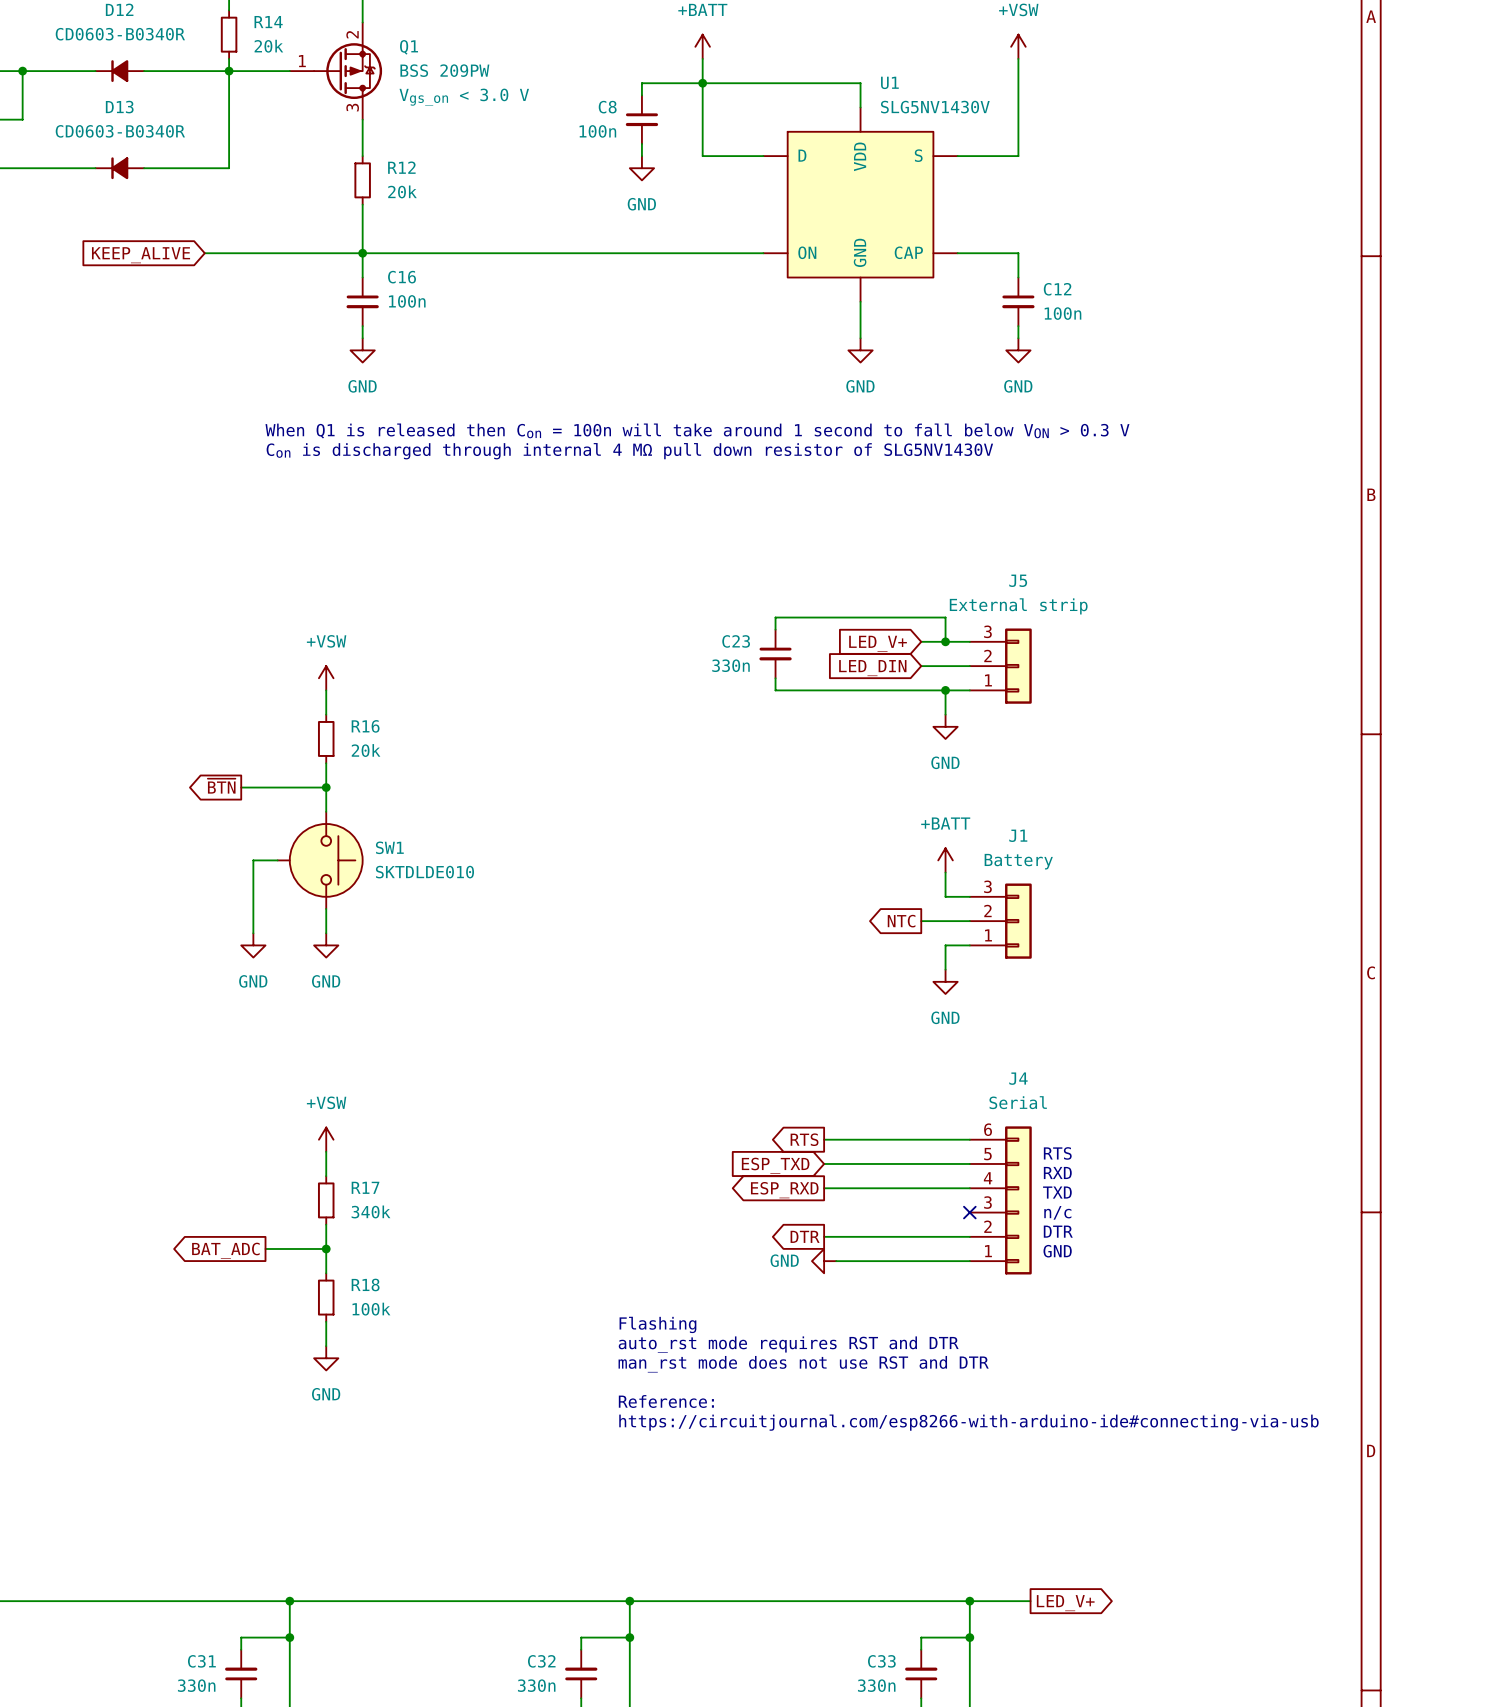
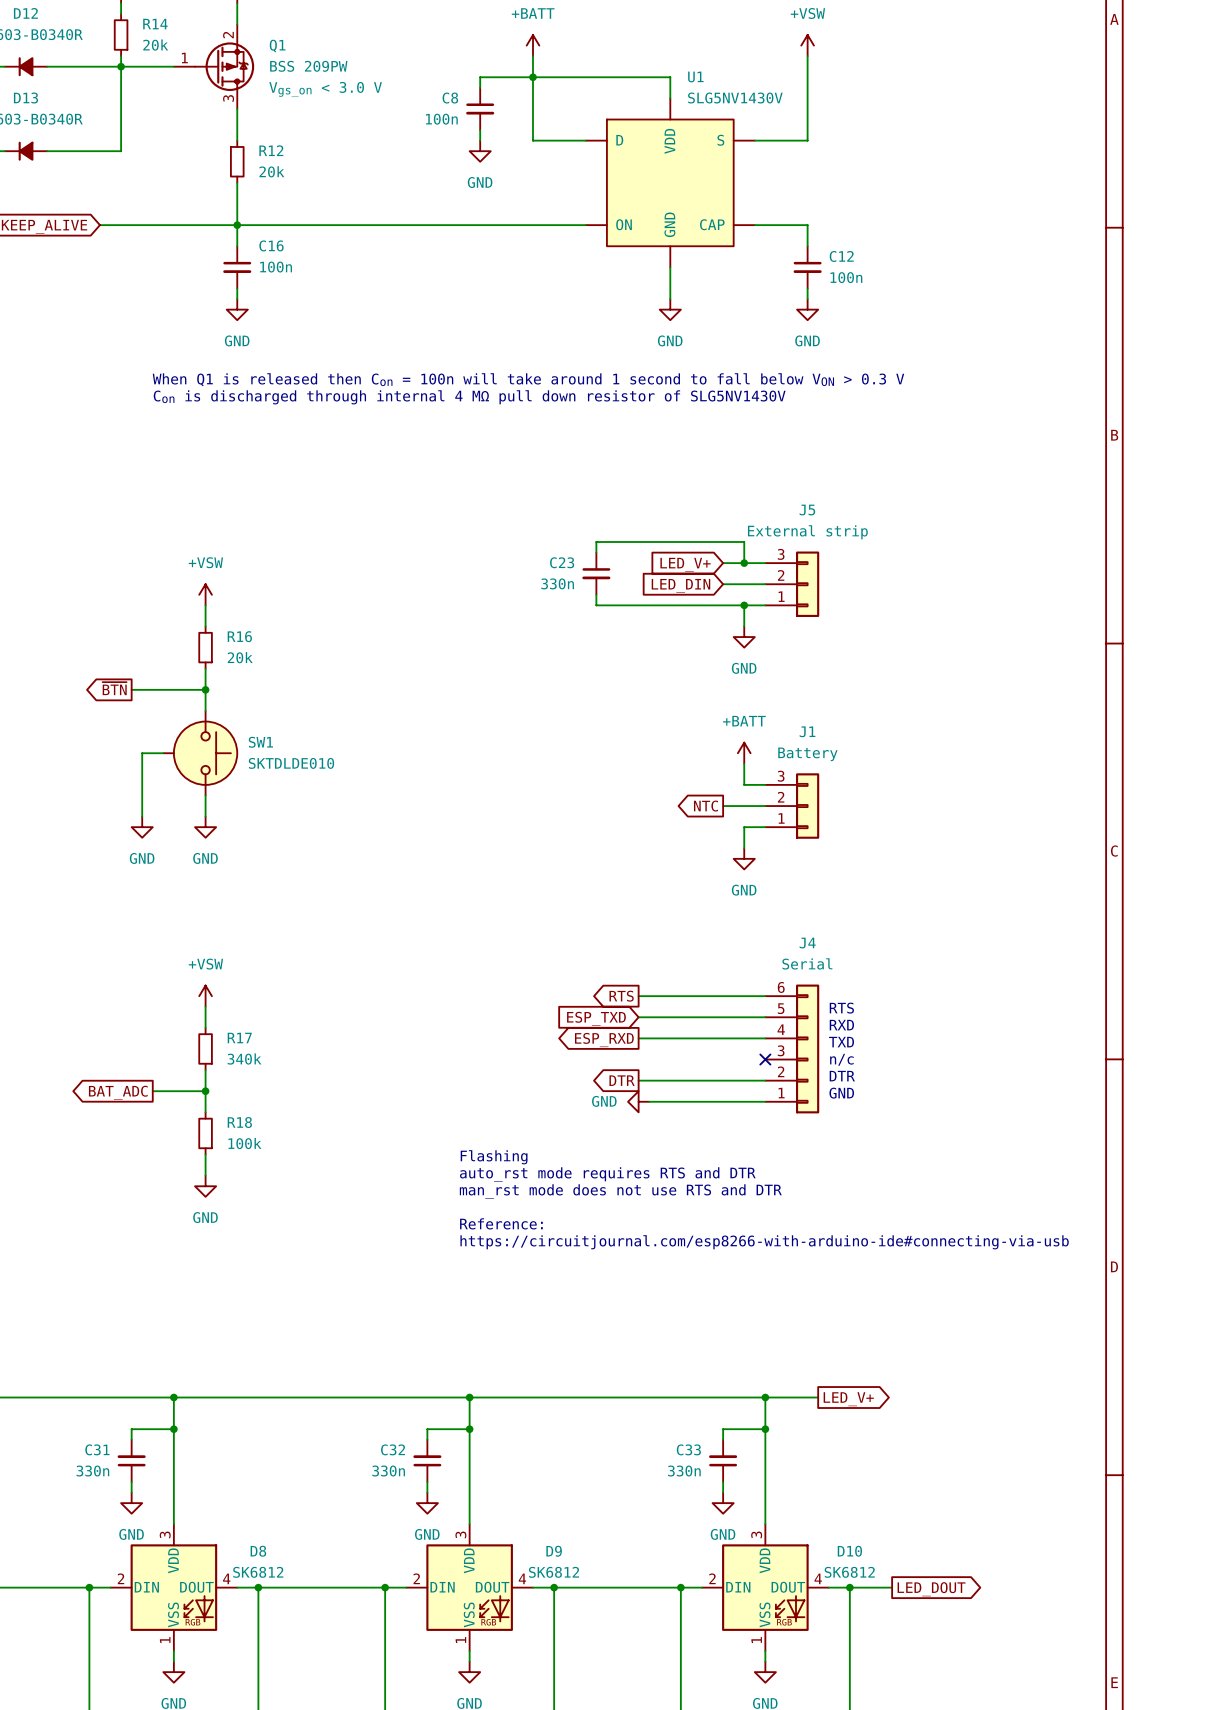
text: auto_rst mode requires RST and DTR (788, 1344) -> auto_rst mode requires RTS and DTR (607, 1174)
text: man_rst mode does not use RST and DTR (803, 1364) -> man_rst mode does not use RTS and DTR (620, 1191)

